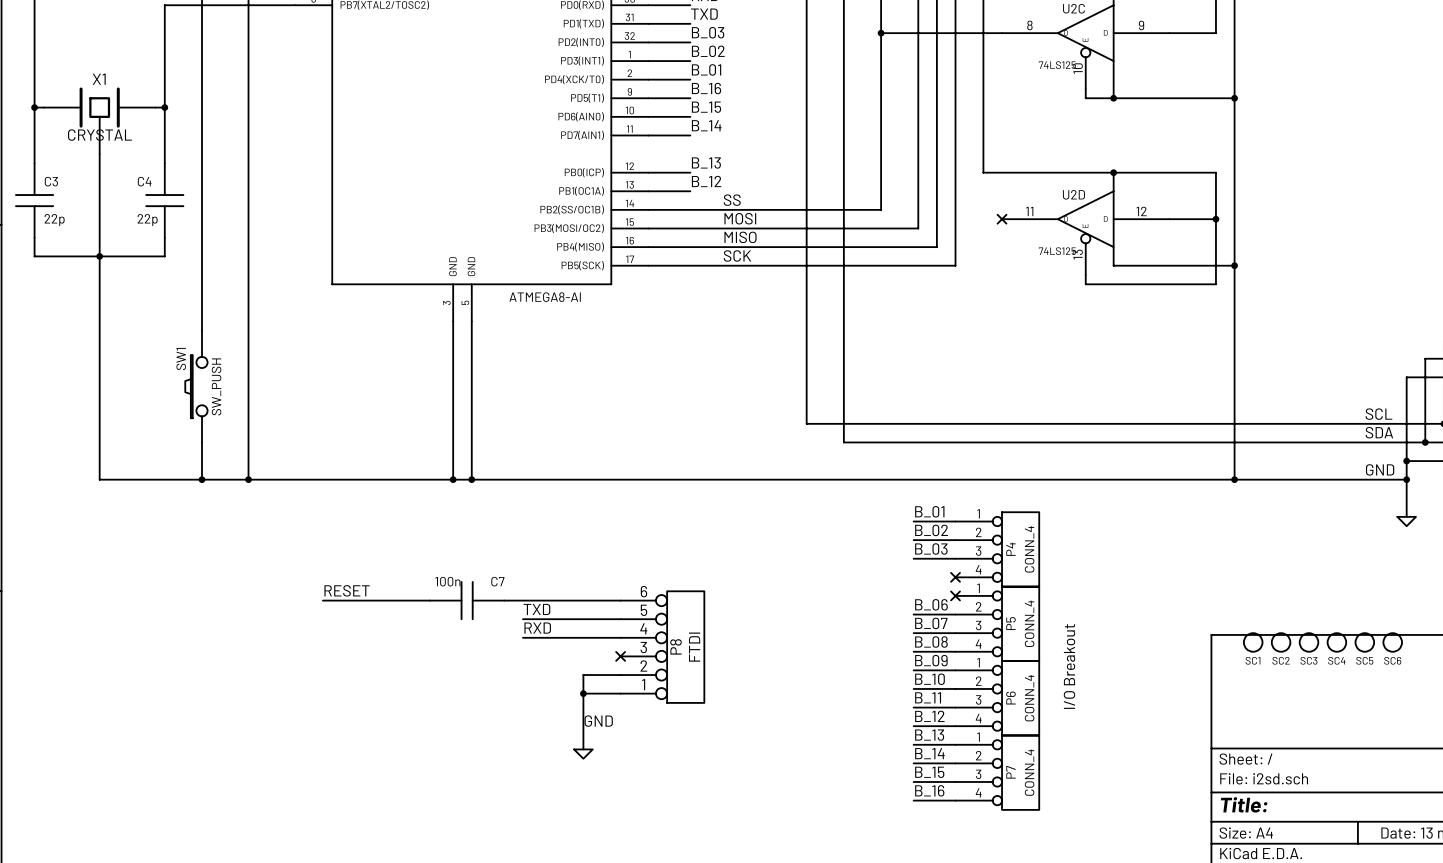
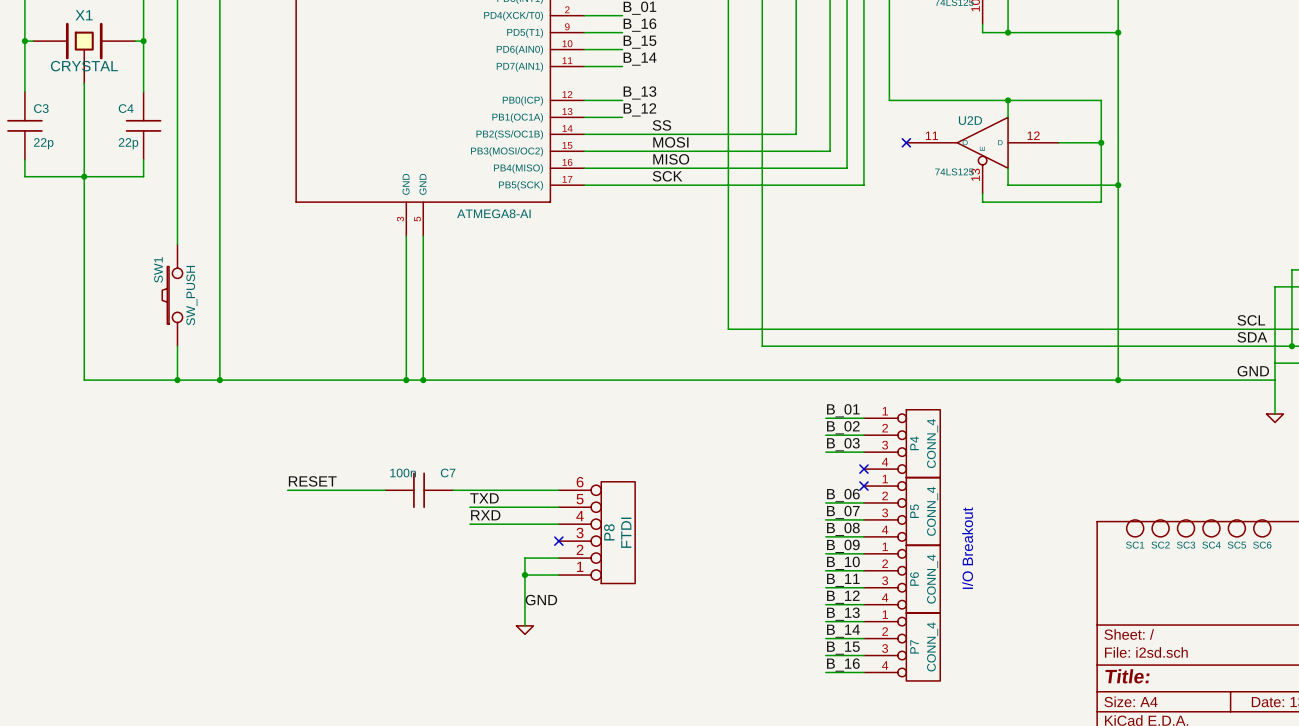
junction: (1406, 461) -> none
junction: (1406, 479) -> none

